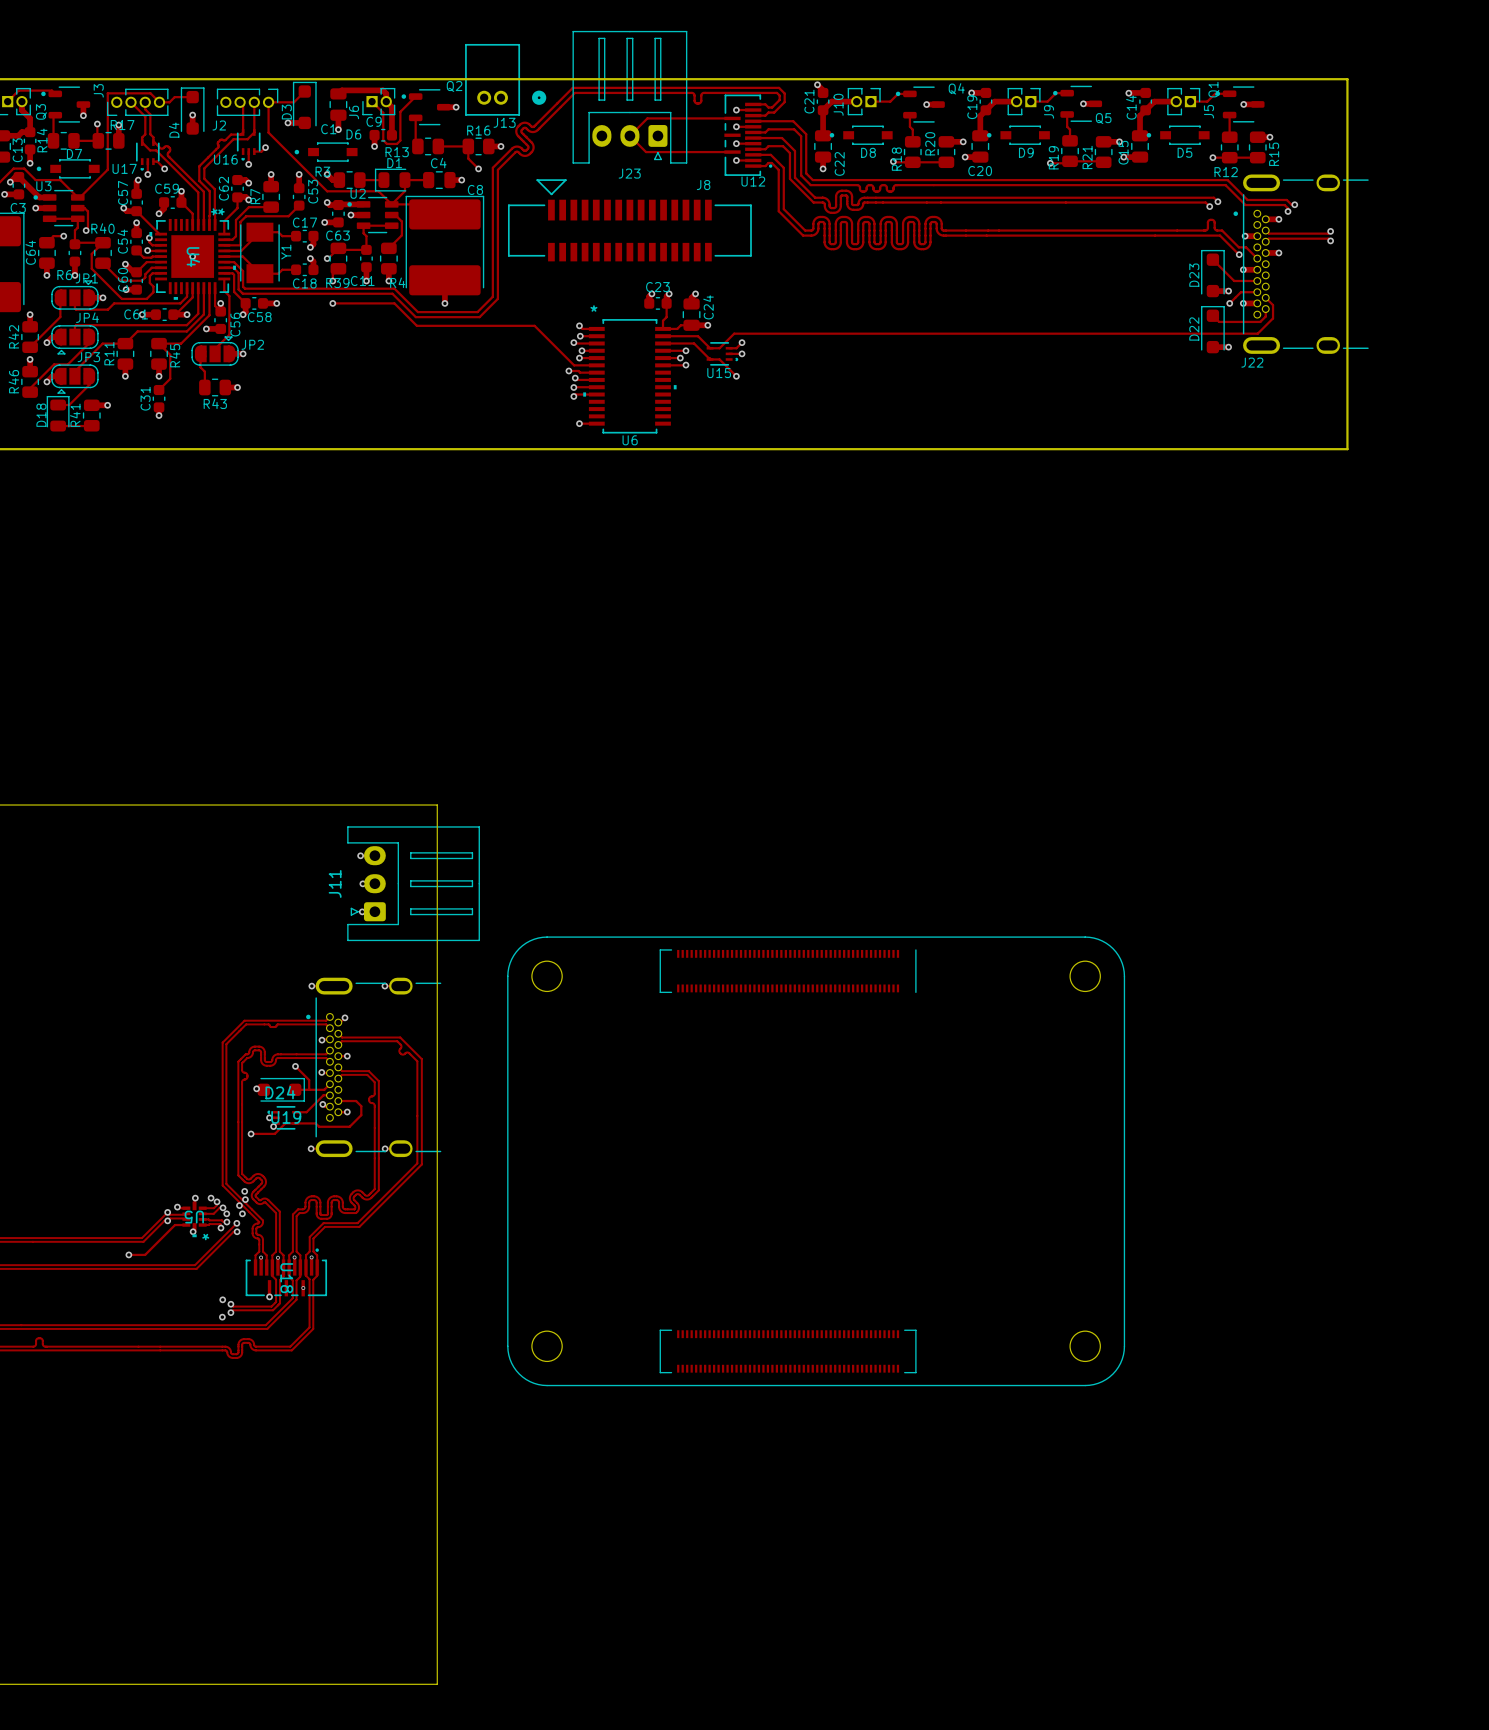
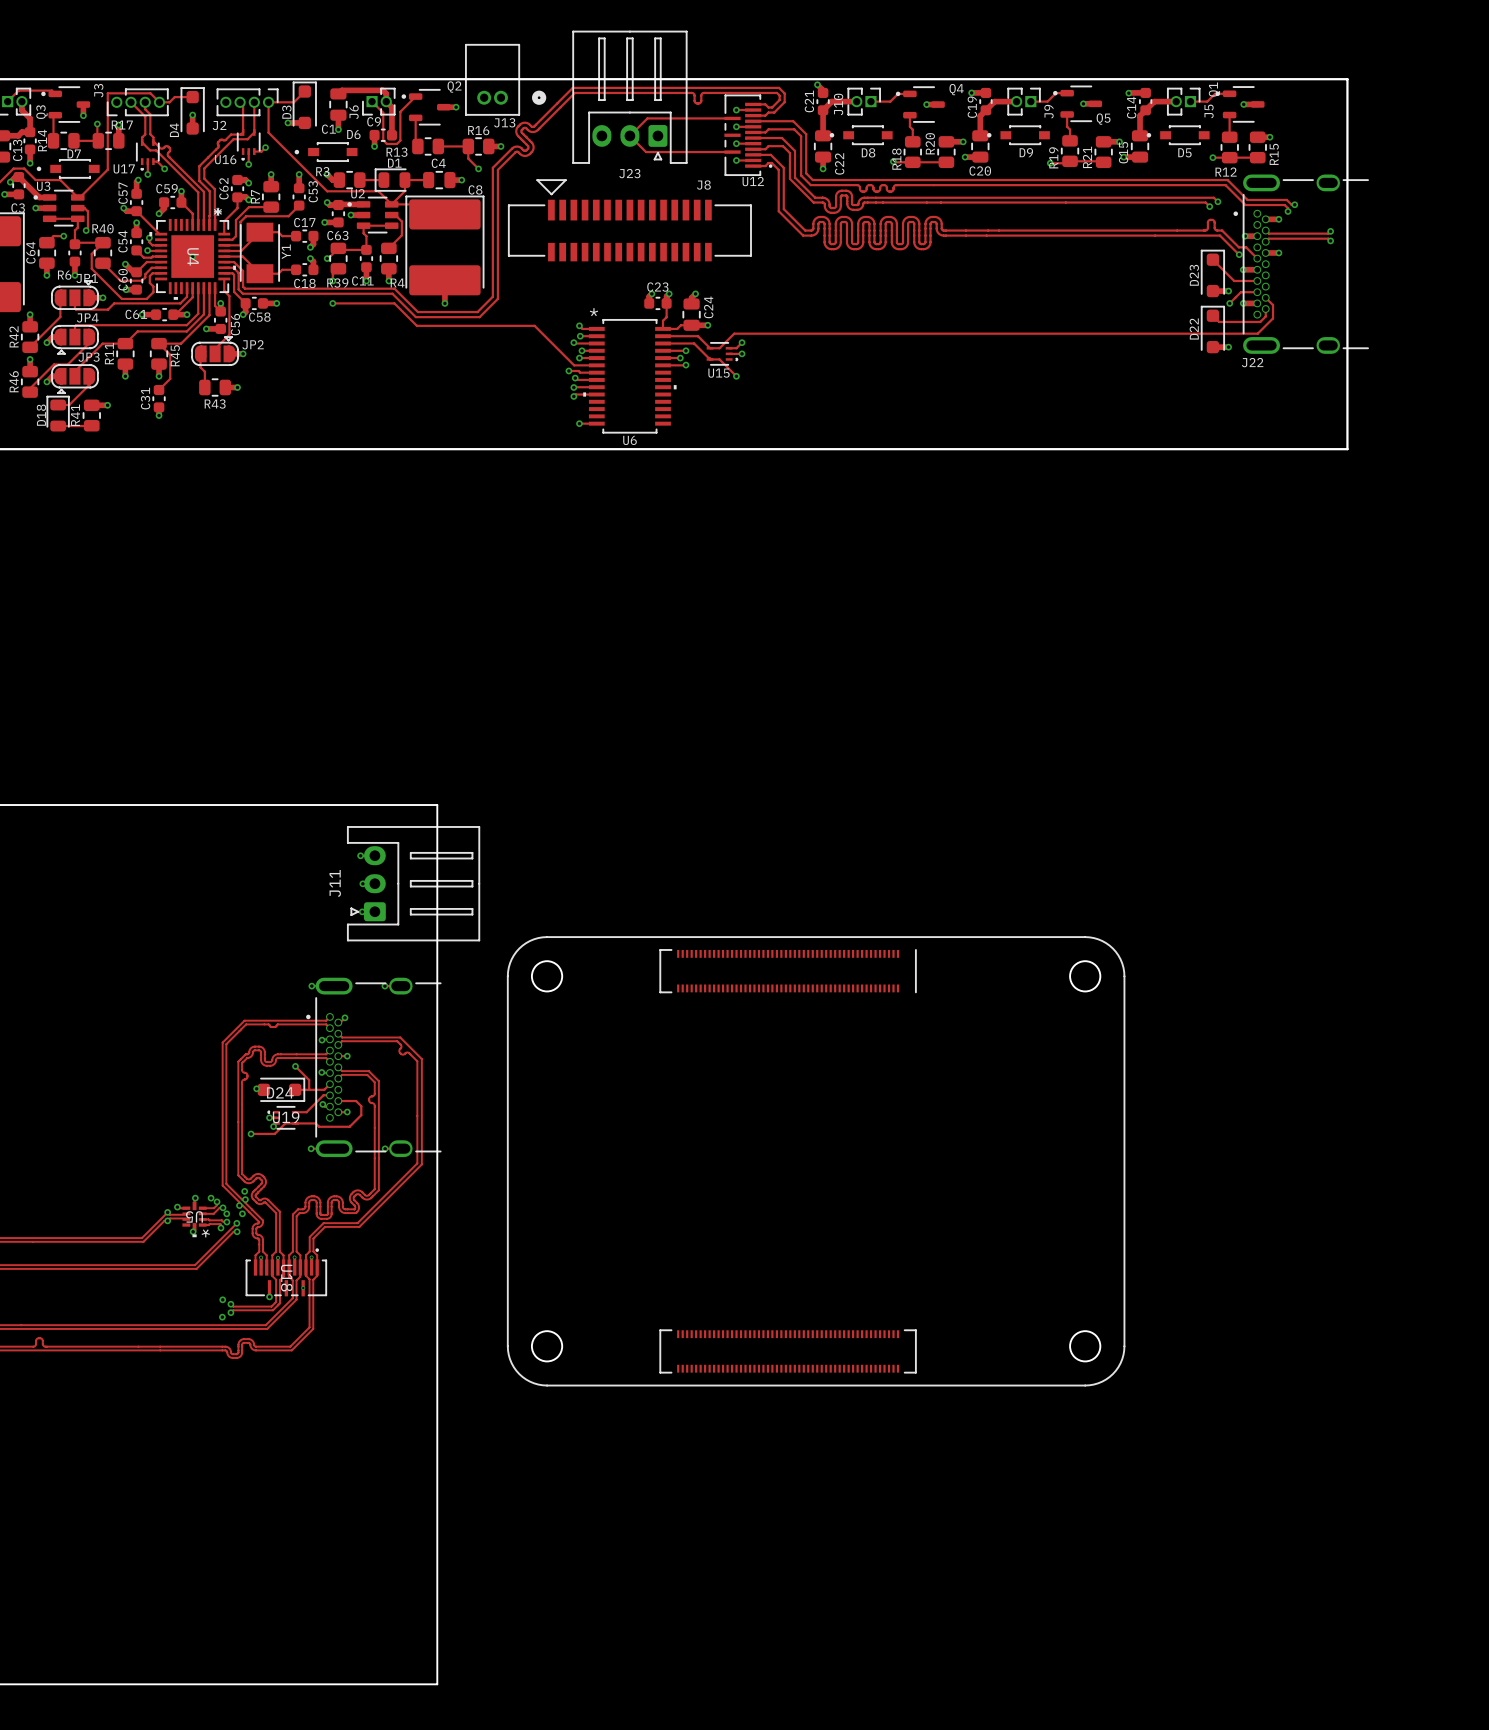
track: (186, 1225) (175, 1225) (145, 1254) (128, 1254) -> none
via: (128, 1254) -> none

